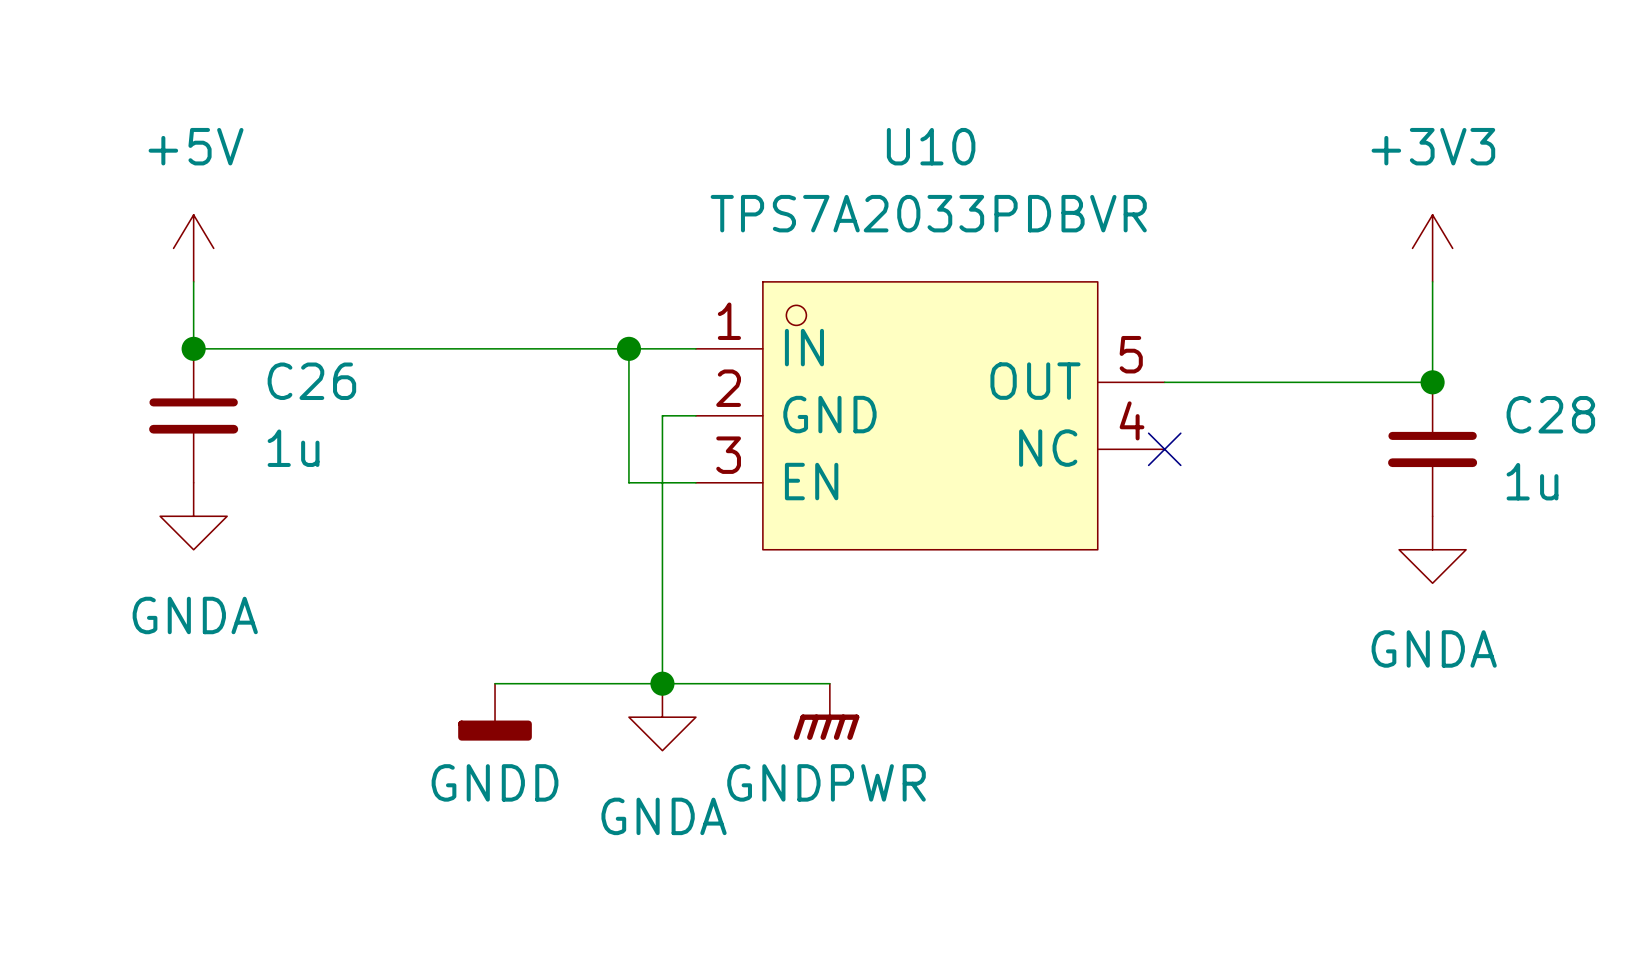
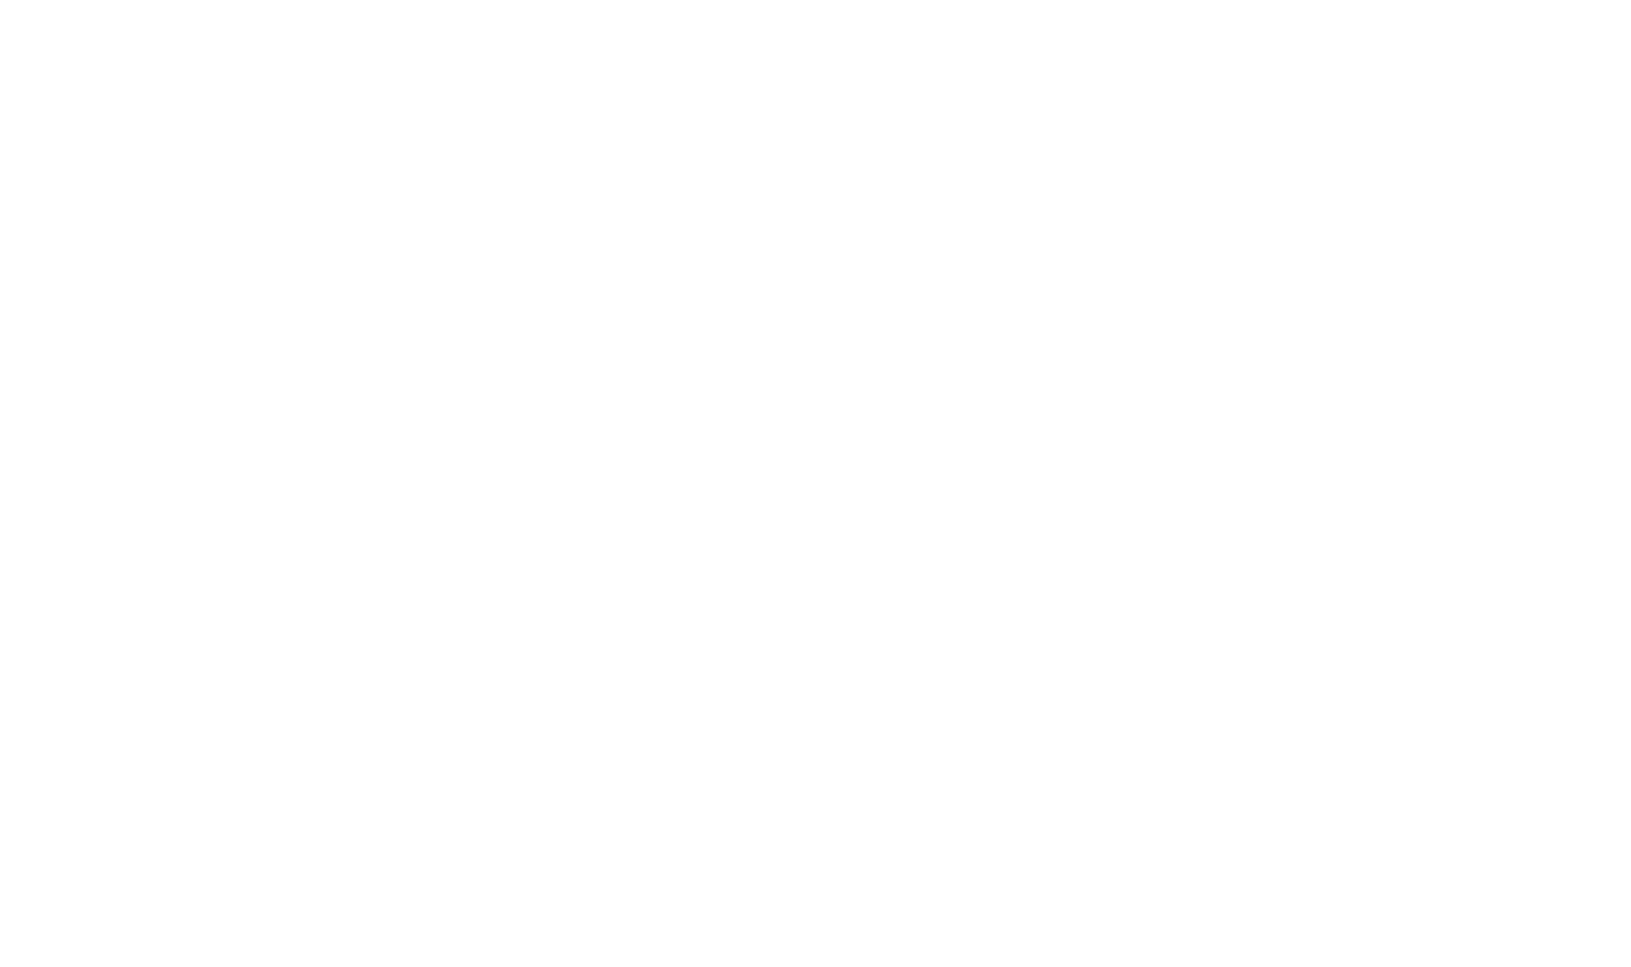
power symbol: +5V (193, 248) -> none
power symbol: +3V3 (1432, 248) -> none
wire: (193, 281) (193, 348) (695, 348) -> none
wire: (1432, 281) (1432, 382) (1164, 382) -> none
junction: (193, 348) -> none
wire: (628, 348) (628, 482) (695, 482) -> none
junction: (628, 348) -> none
junction: (1432, 382) -> none
C26: 1u (193, 415) -> none
wire: (695, 415) (662, 415) (662, 683) -> none
U10: TPS7A2033PDBVR (930, 415) -> none
no-connect mark: (1164, 449) -> none
C28: 1u (1432, 449) -> none
power symbol: GNDA (193, 516) -> none
power symbol: GNDA (1432, 549) -> none
wire: (495, 683) (829, 683) -> none
junction: (662, 683) -> none
power symbol: GNDPWR (826, 711) -> none
power symbol: GNDD (495, 712) -> none
power symbol: GNDA (662, 717) -> none

